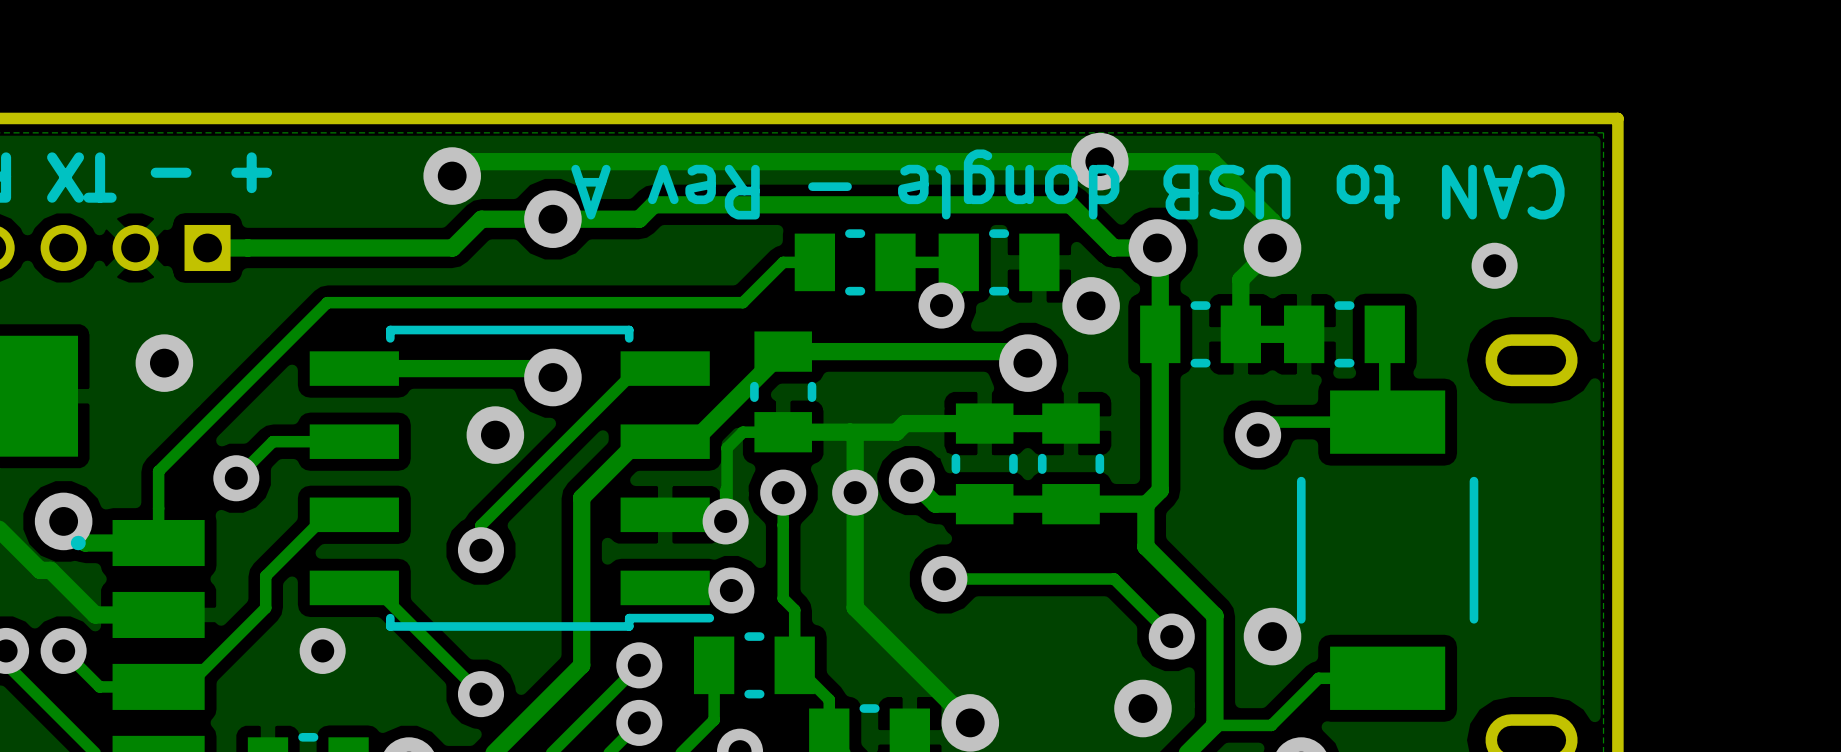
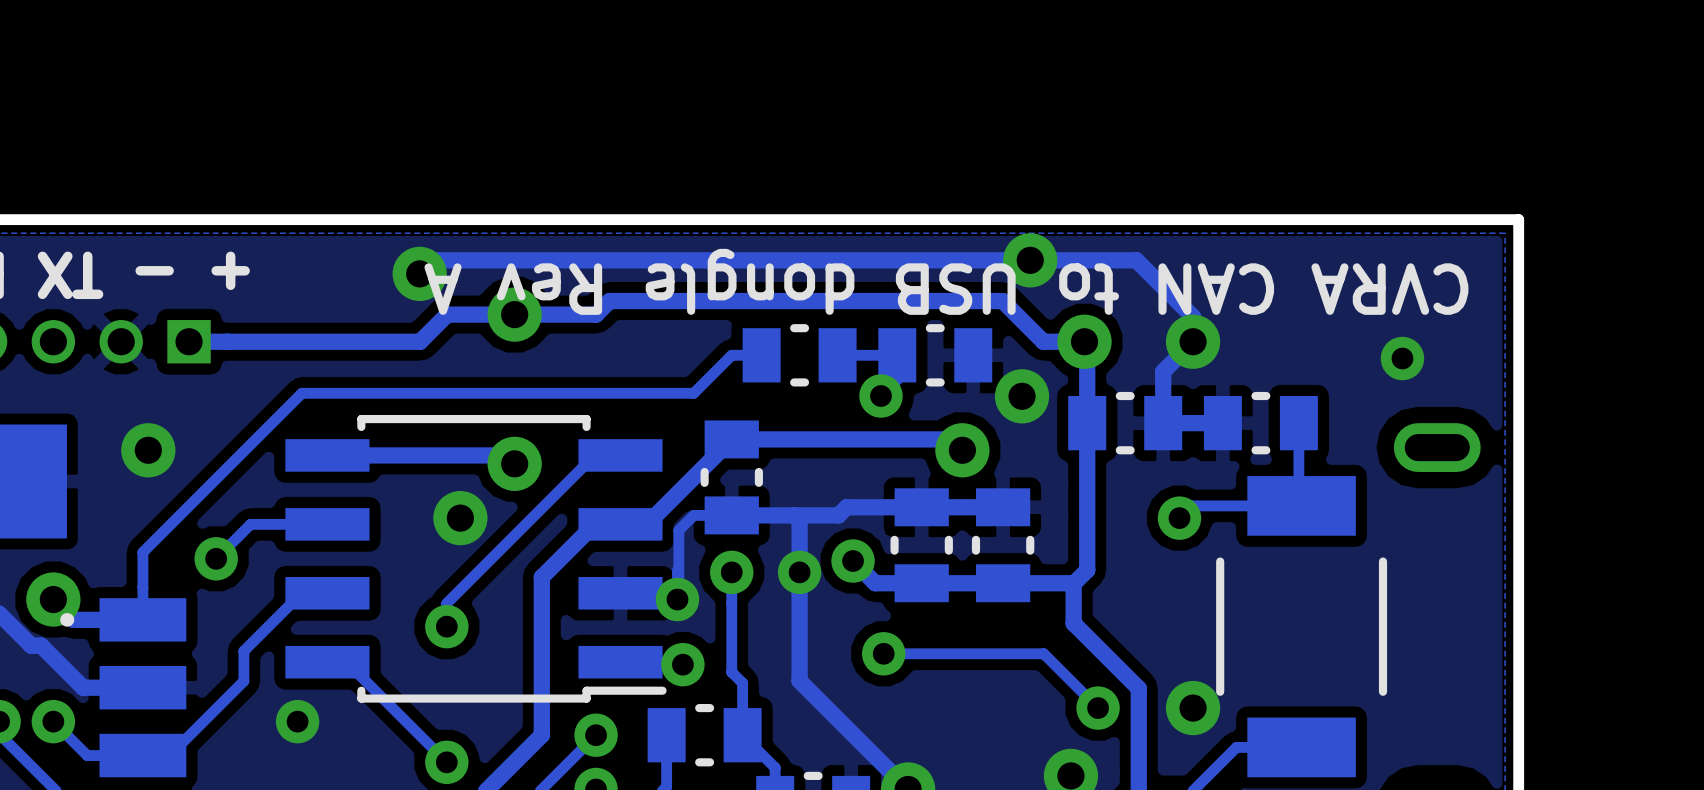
text: CAN to USB dongle - Rev A (1067, 184) -> CVRA CAN to USB dongle Rev A (946, 281)

